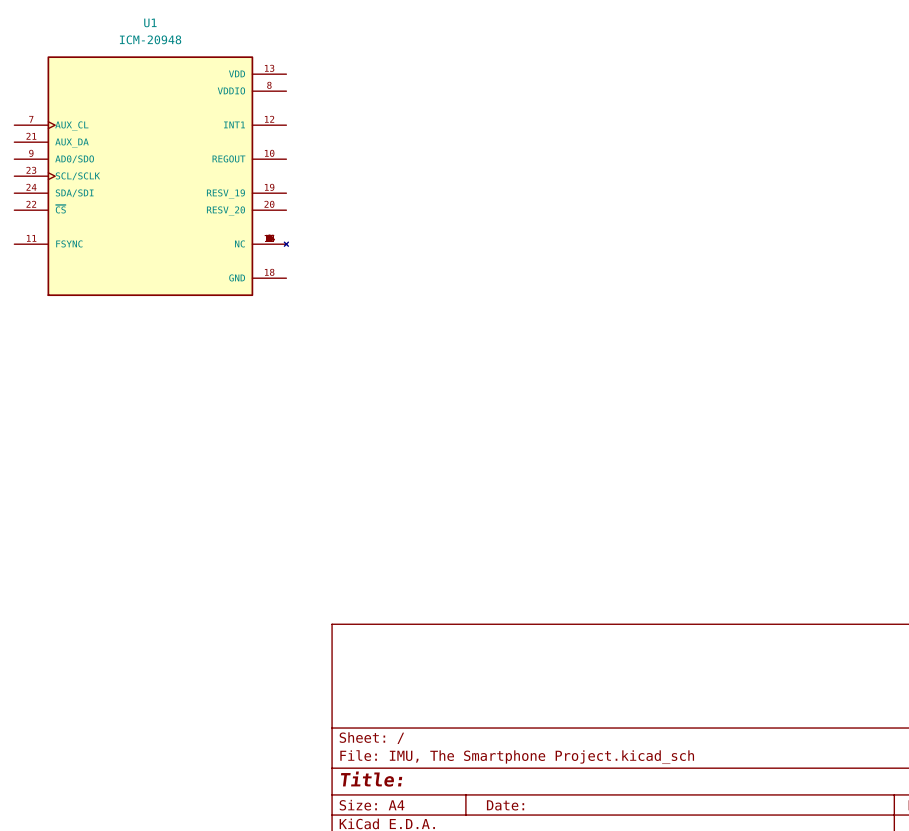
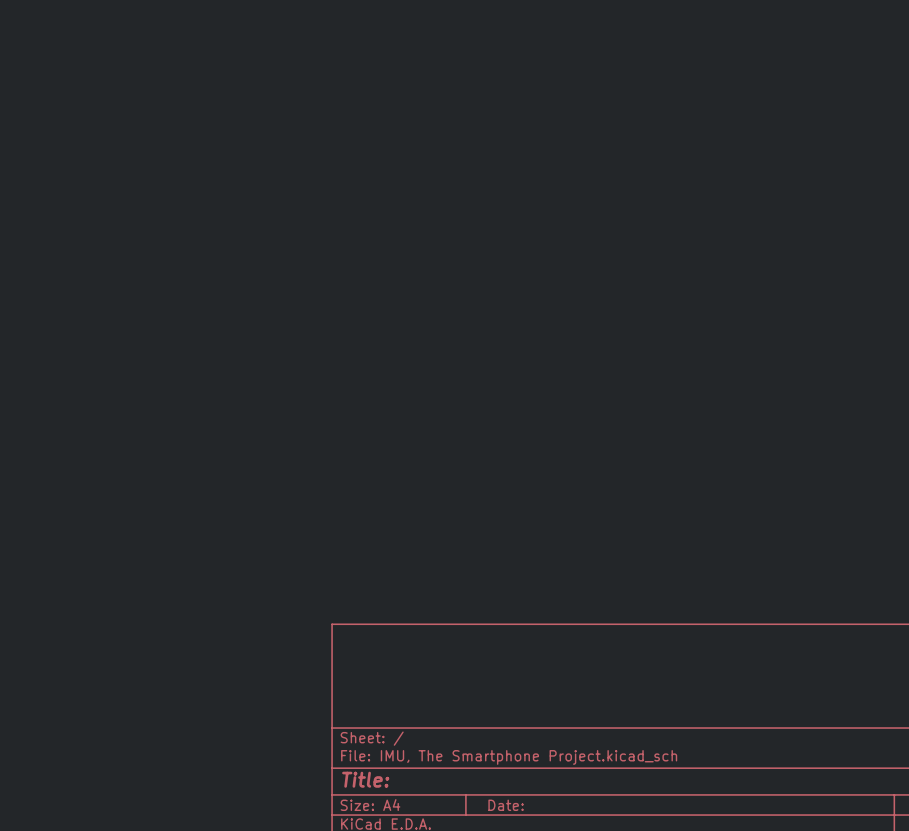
U1: ICM-20948 (151, 176) -> none

